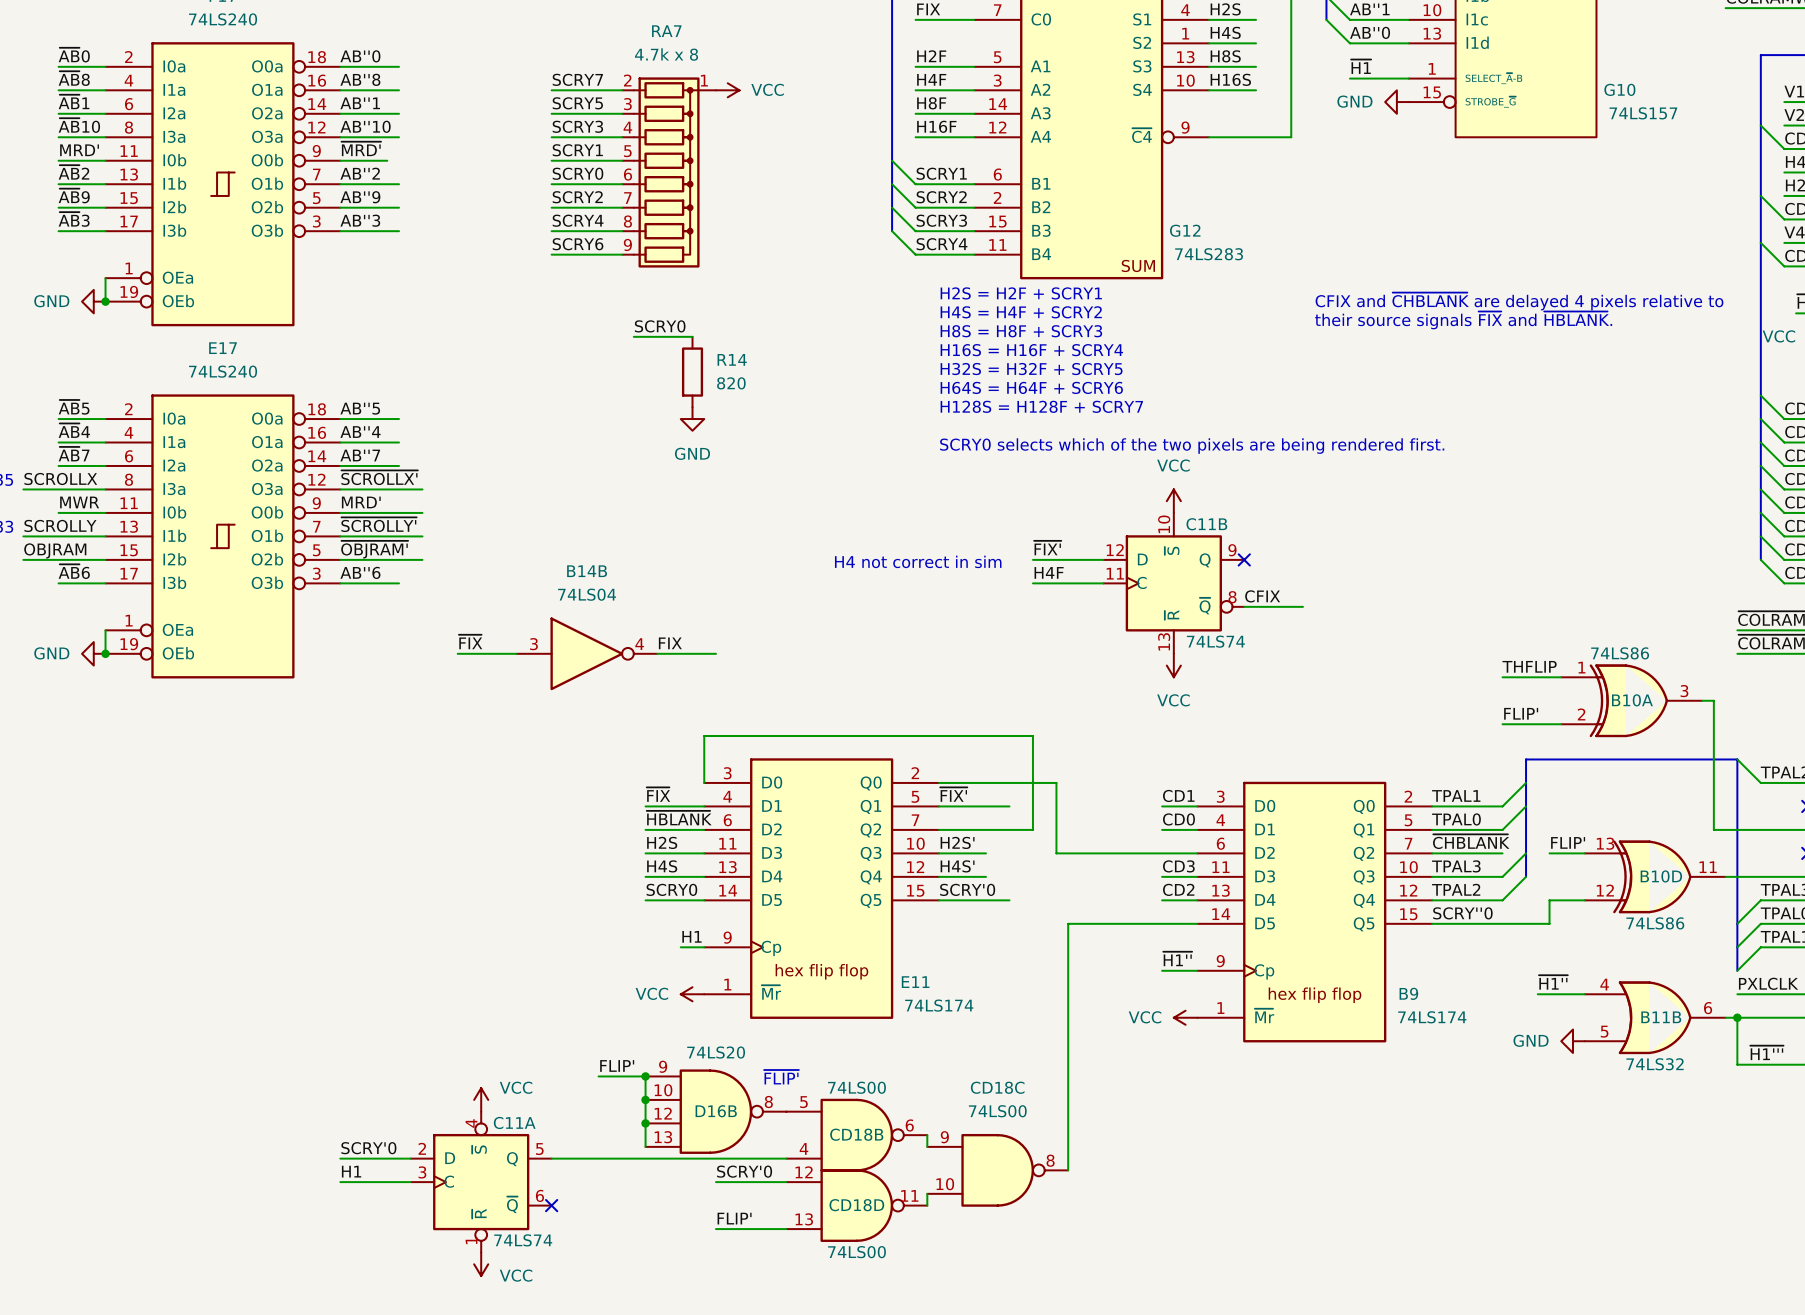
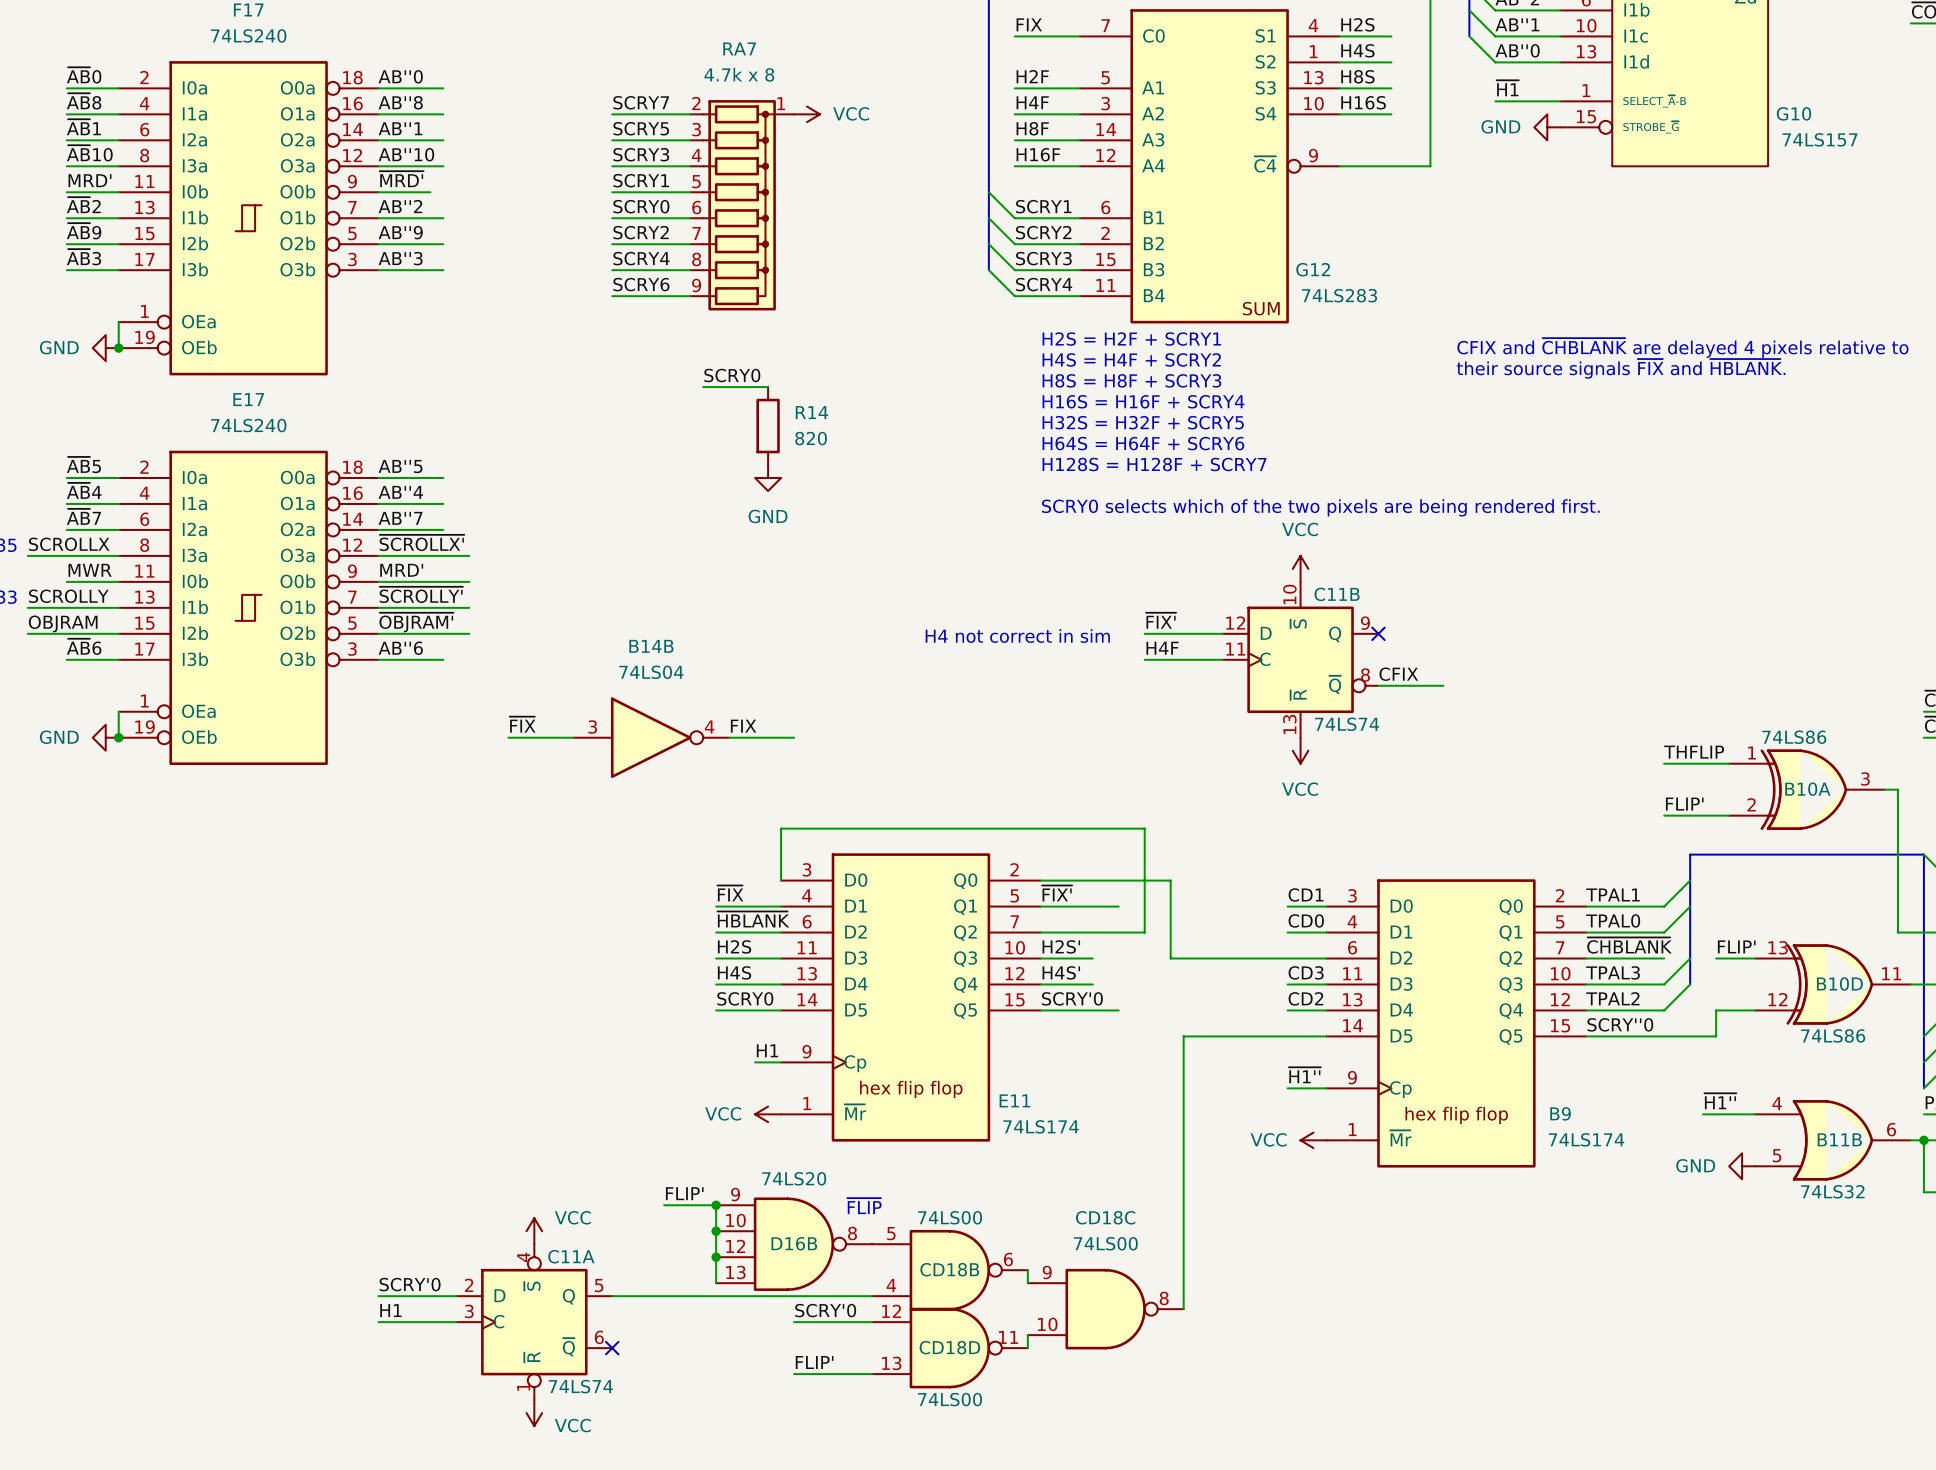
text: ~{FLIP'} (781, 1077) -> ~{FLIP} (864, 1206)

